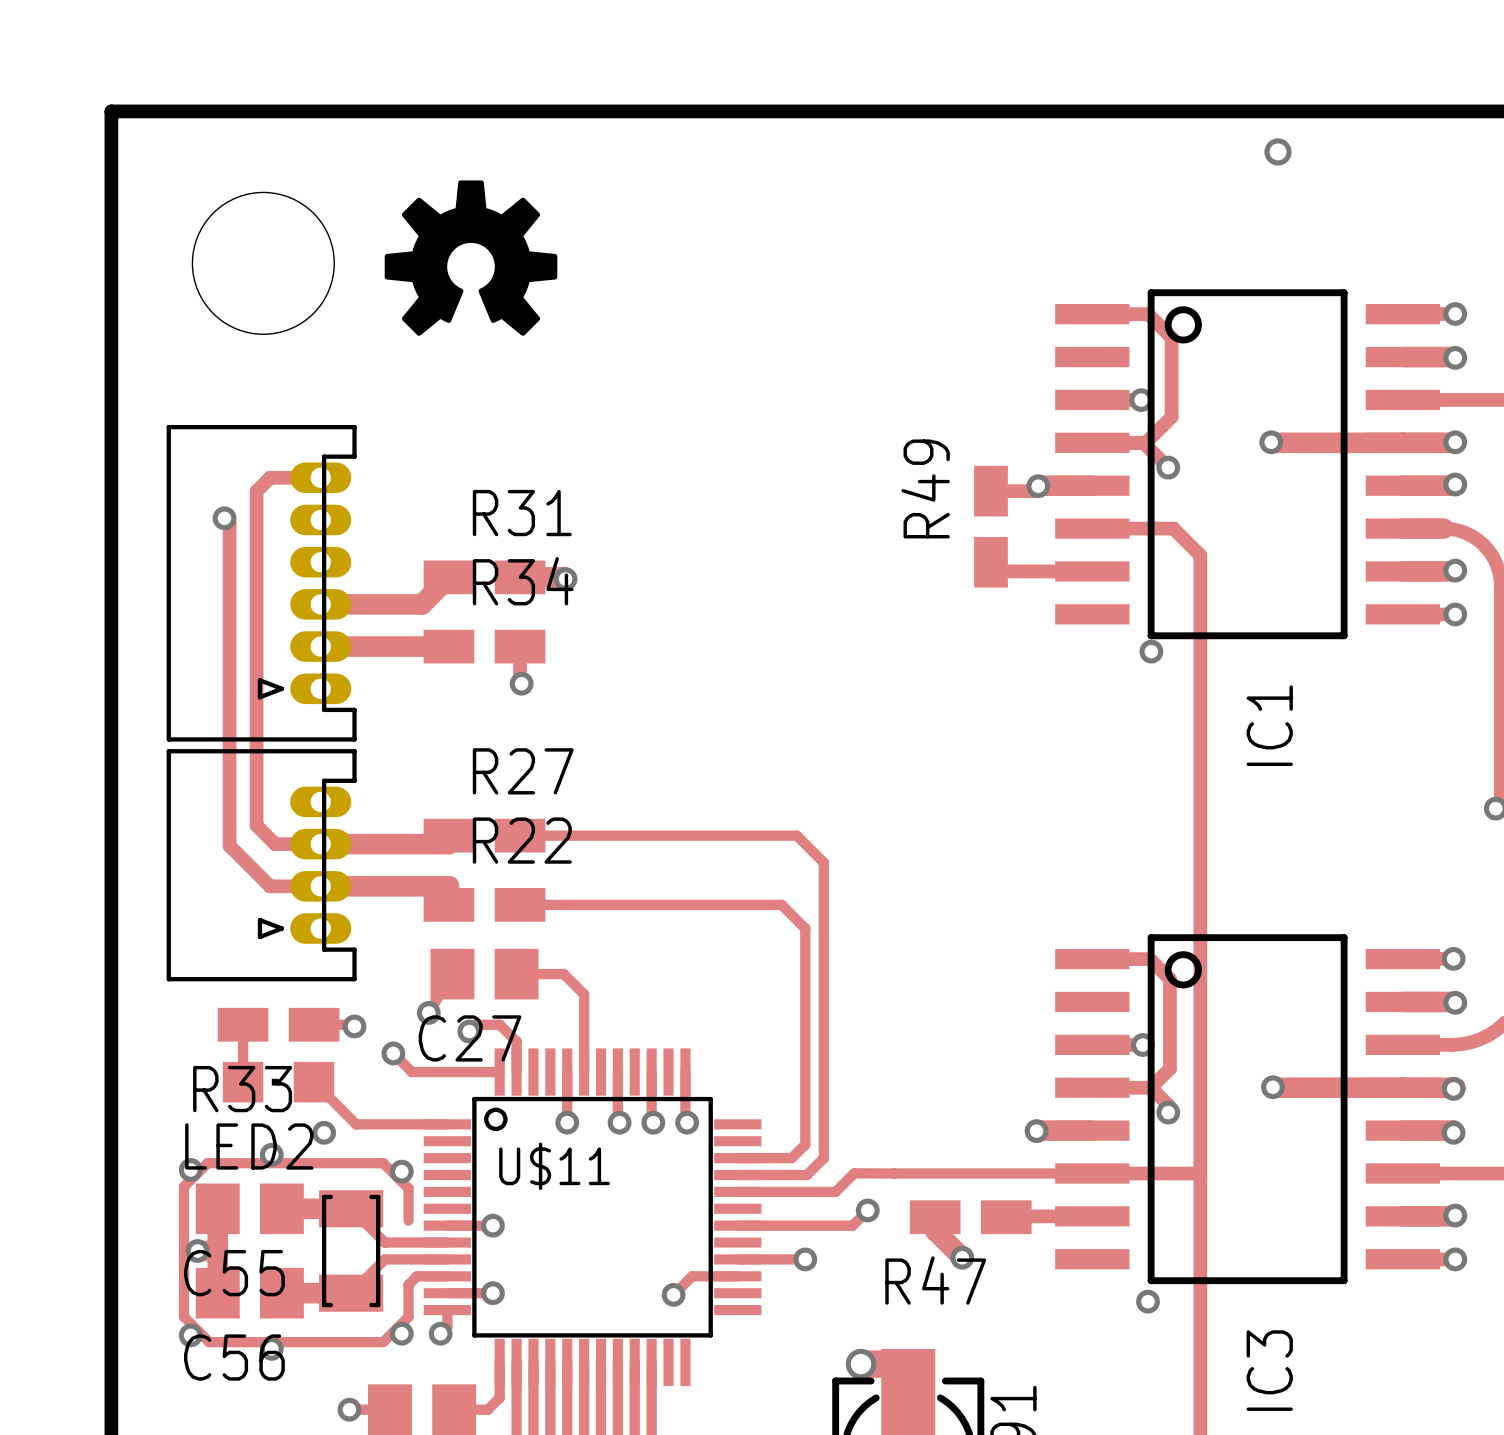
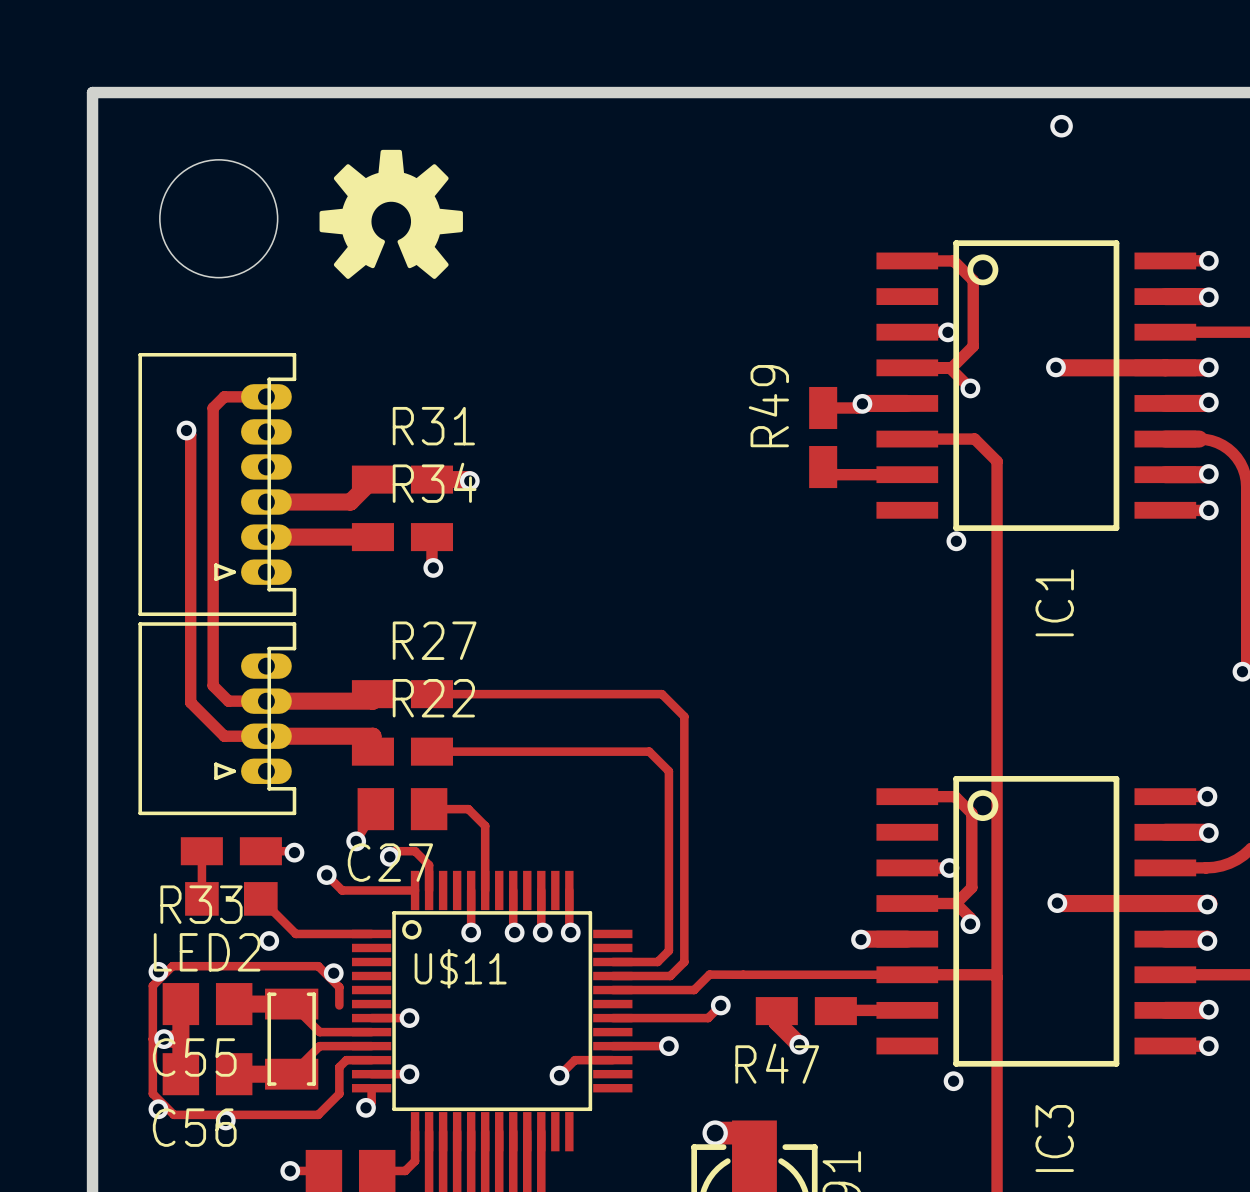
via: (271, 1154) -> none
track: (408, 1210) (408, 1220) -> none
via: (401, 1333) -> none

